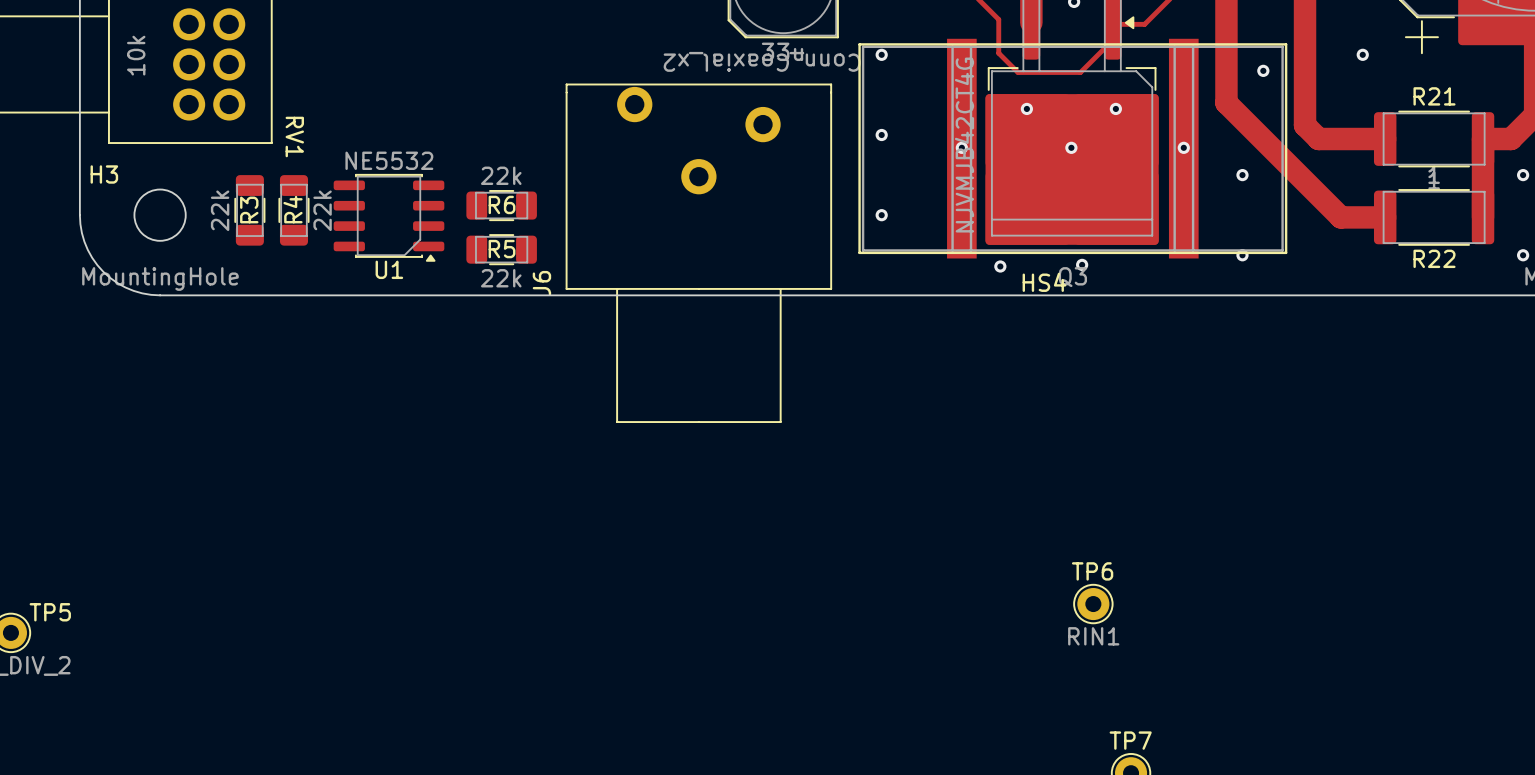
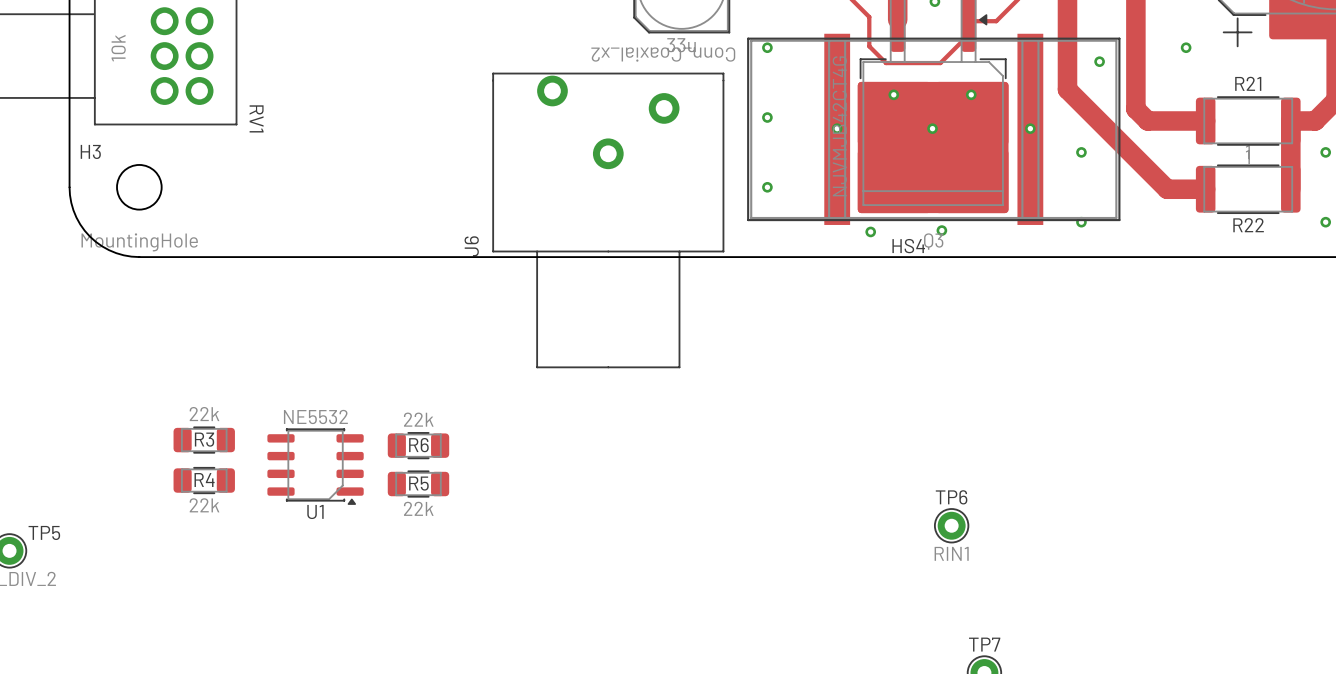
R6 position: (501, 205) -> (418, 445)
R3 rotation: 0° (249, 210) -> 90° clockwise (204, 440)
R3 position: (249, 210) -> (204, 440)
R4 rotation: 0° (293, 210) -> 90° clockwise (204, 480)
R4 position: (293, 210) -> (204, 480)
U1 position: (388, 217) -> (315, 466)
R5 position: (501, 249) -> (418, 484)

